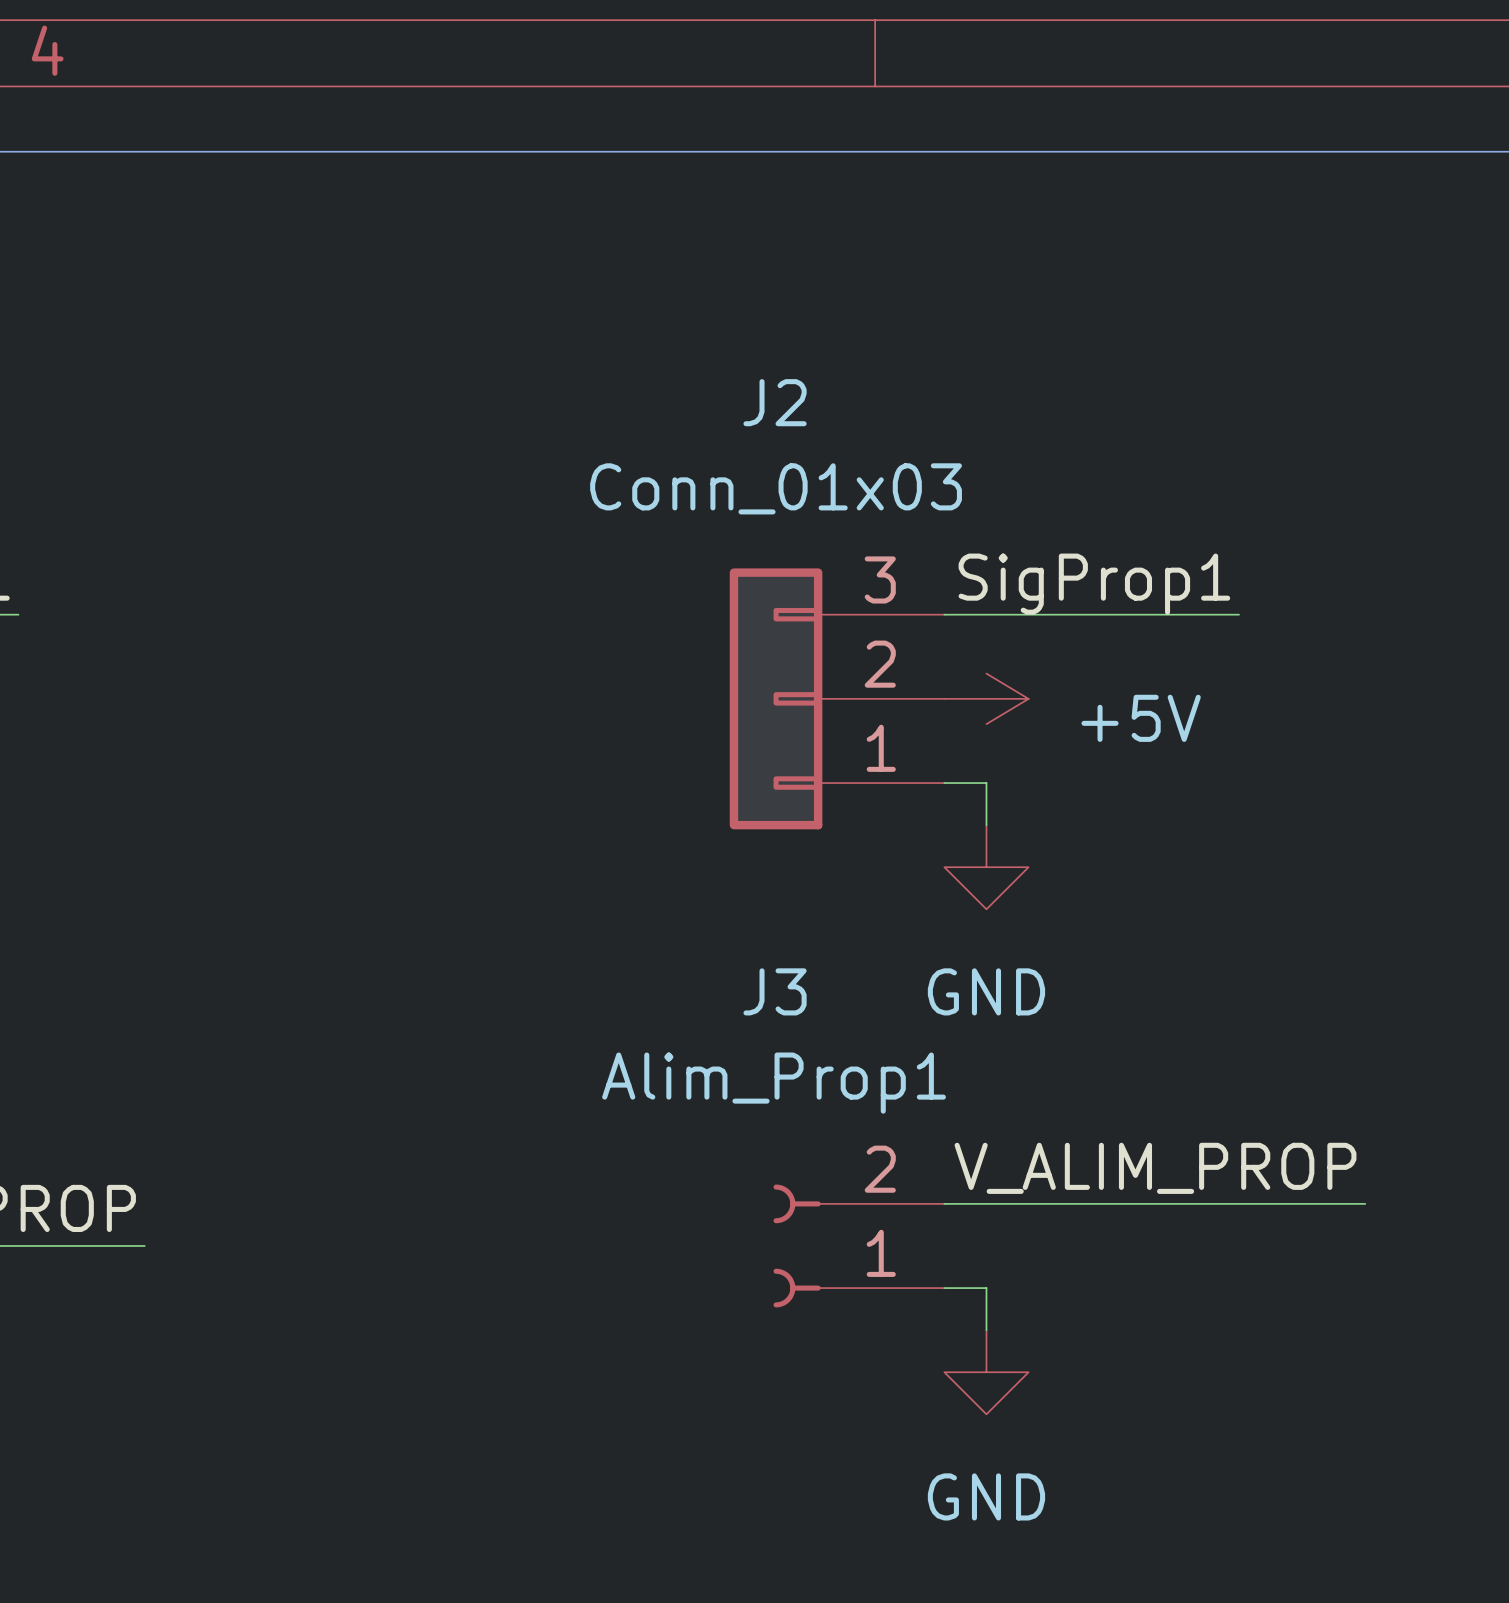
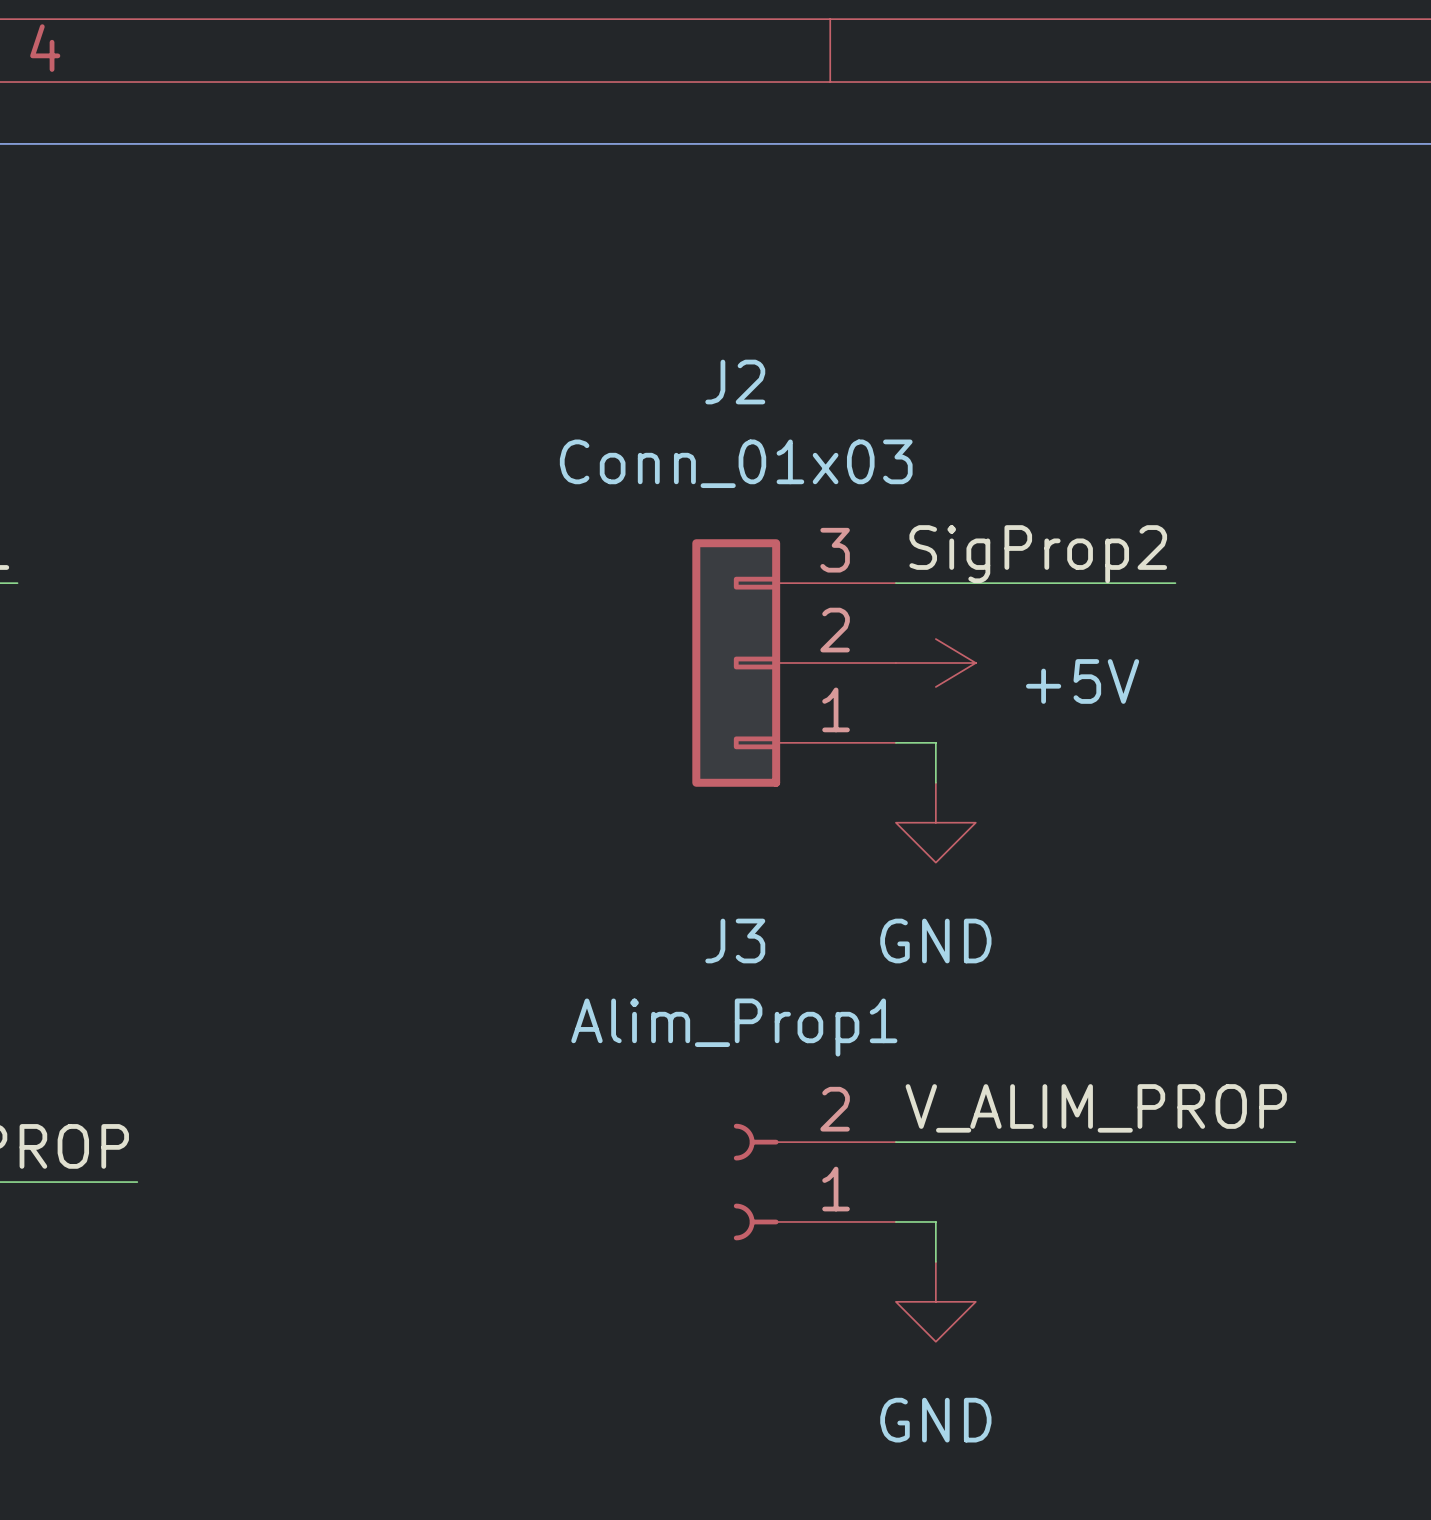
label: SigProp1 (1094, 584) -> SigProp2 (1038, 554)

